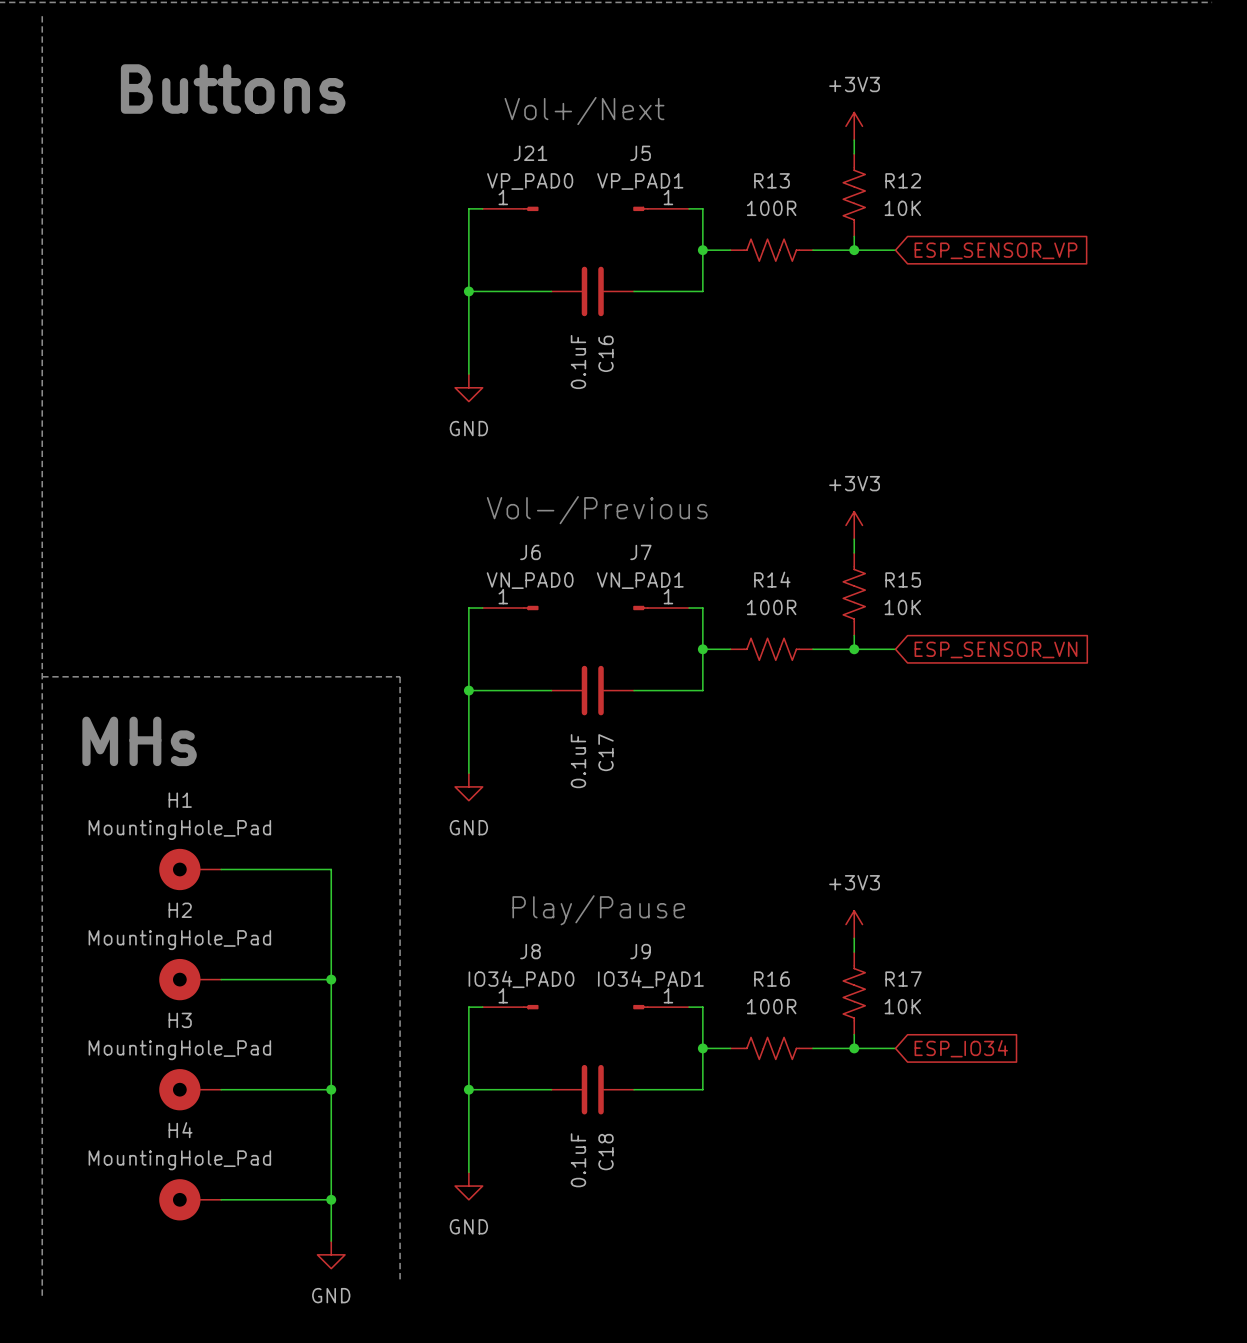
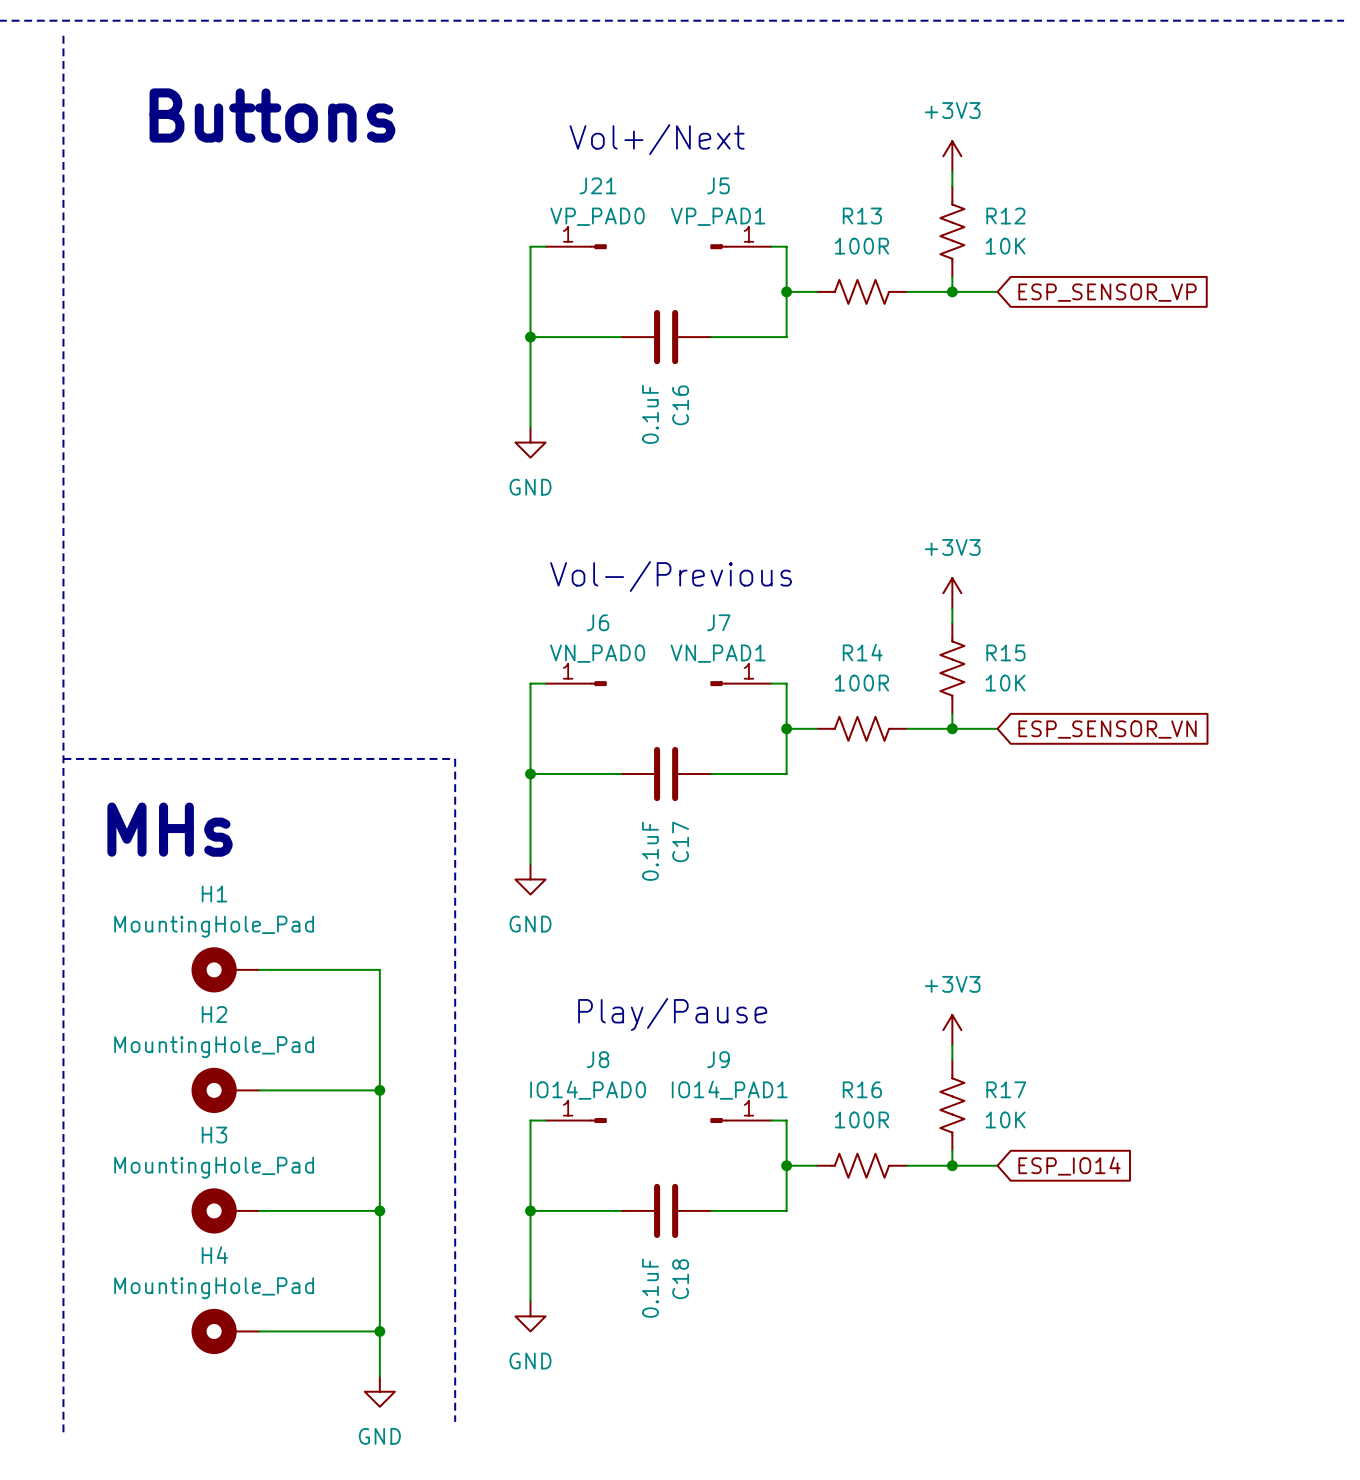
J8 value: IO34_PAD0 (521, 979) -> IO14_PAD0 (588, 1090)
J9 value: IO34_PAD1 (650, 979) -> IO14_PAD1 (729, 1090)
global label: ESP_IO34 (961, 1048) -> ESP_IO14 (1069, 1166)

